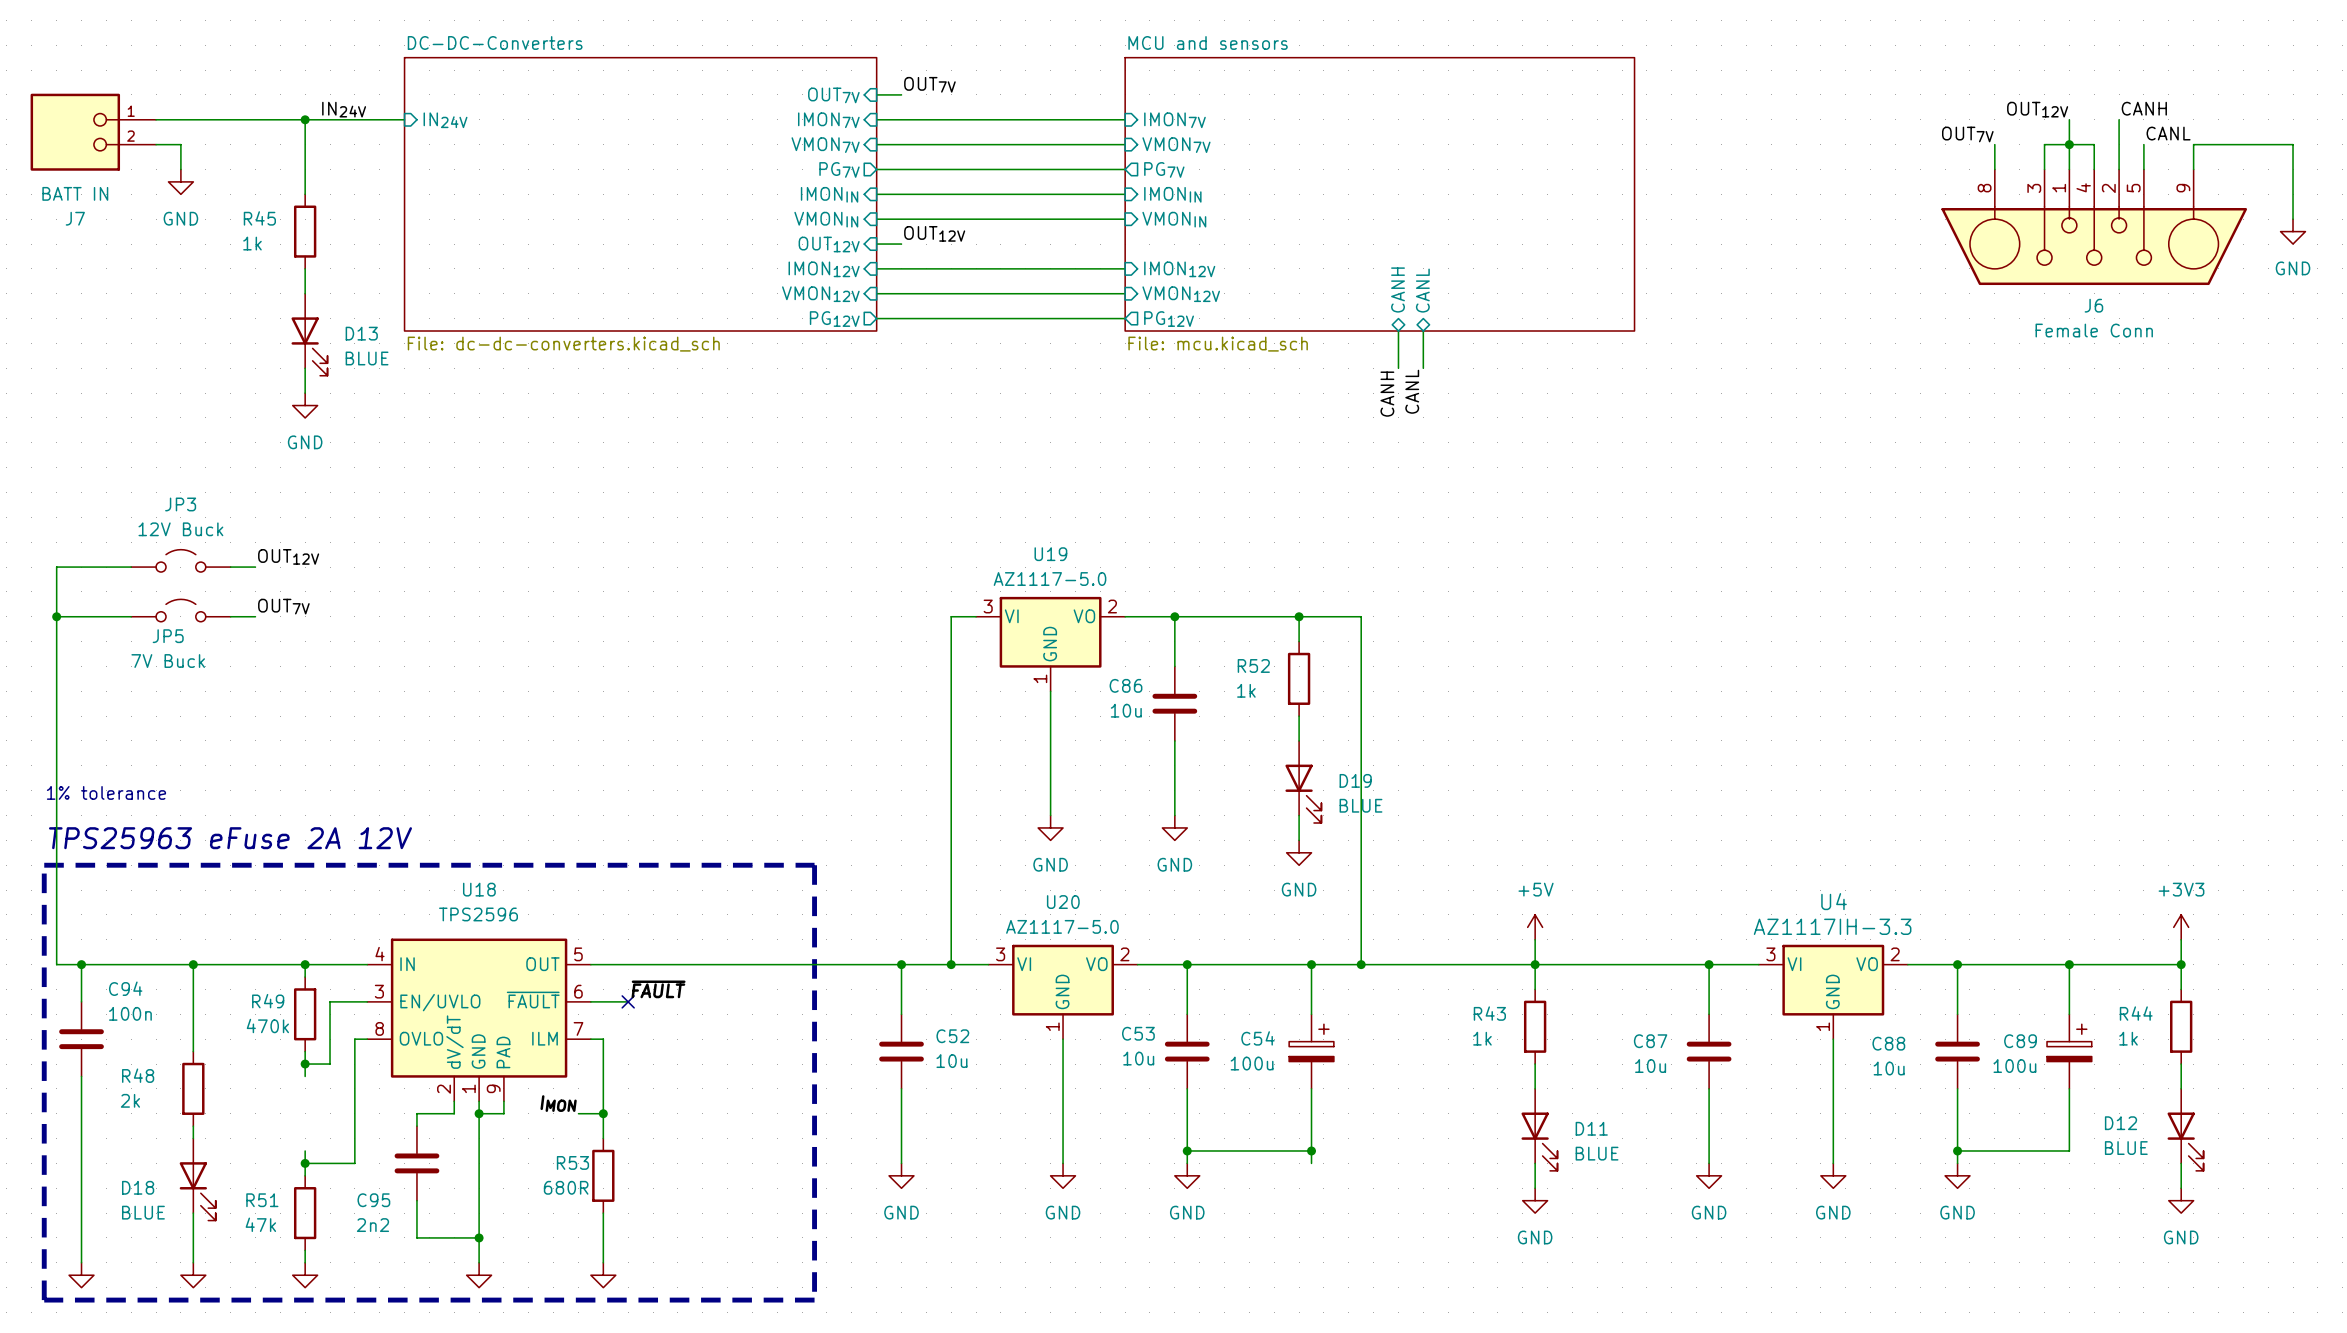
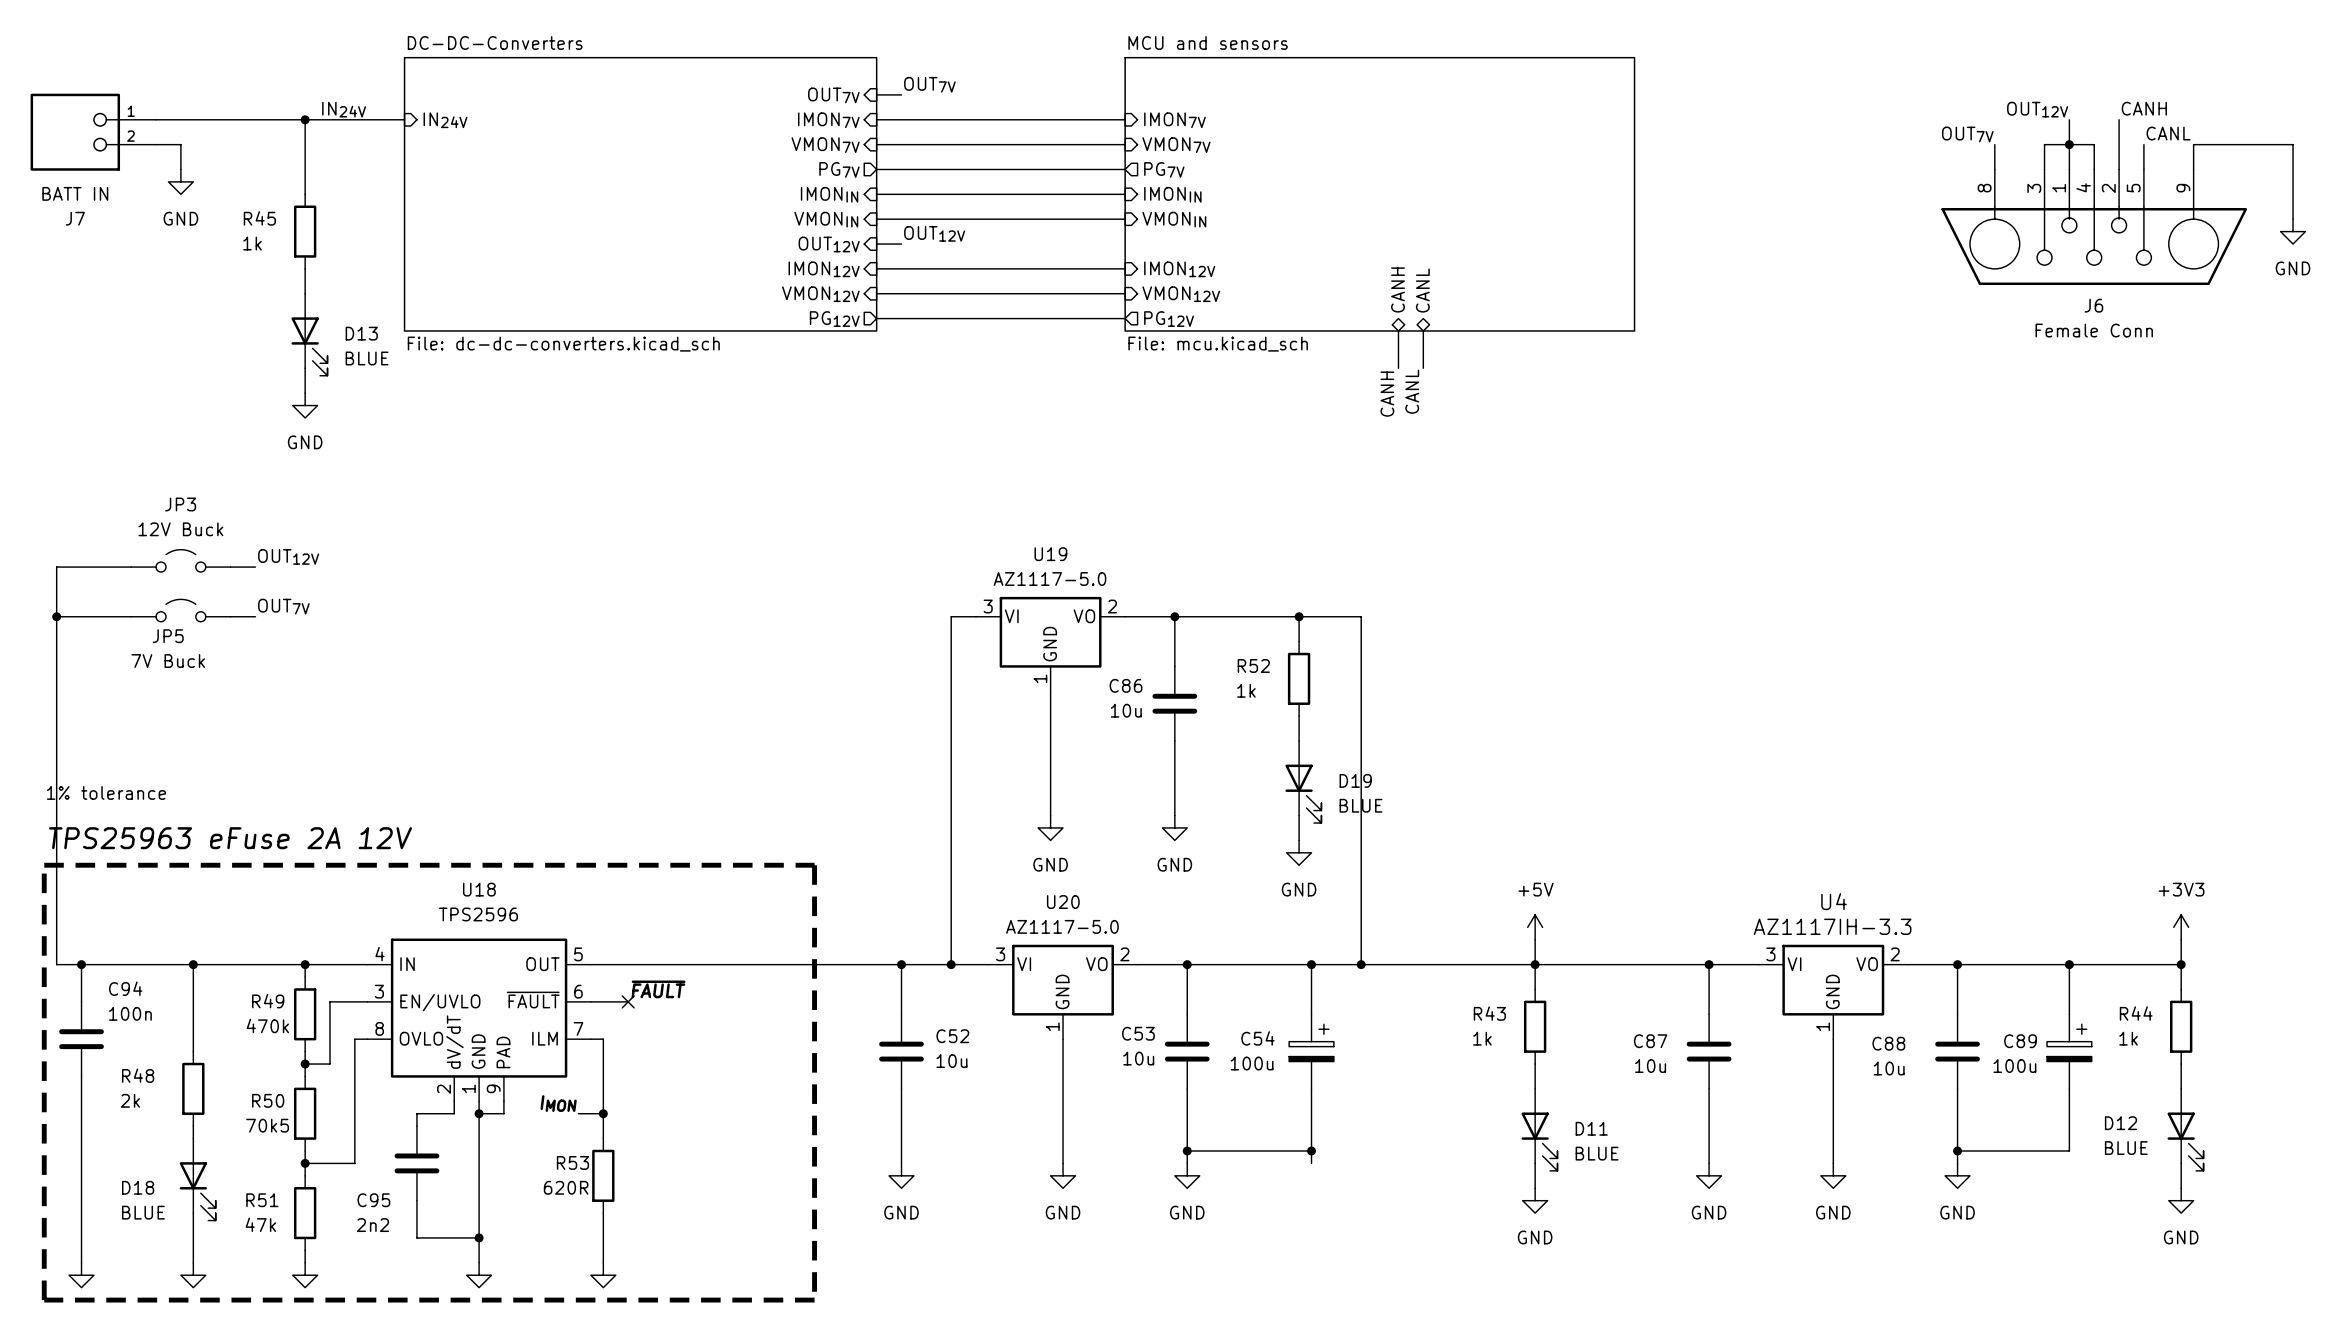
R50: none -> 70k5 (305, 1113)
R53 value: 680R (566, 1187) -> 620R (566, 1187)

